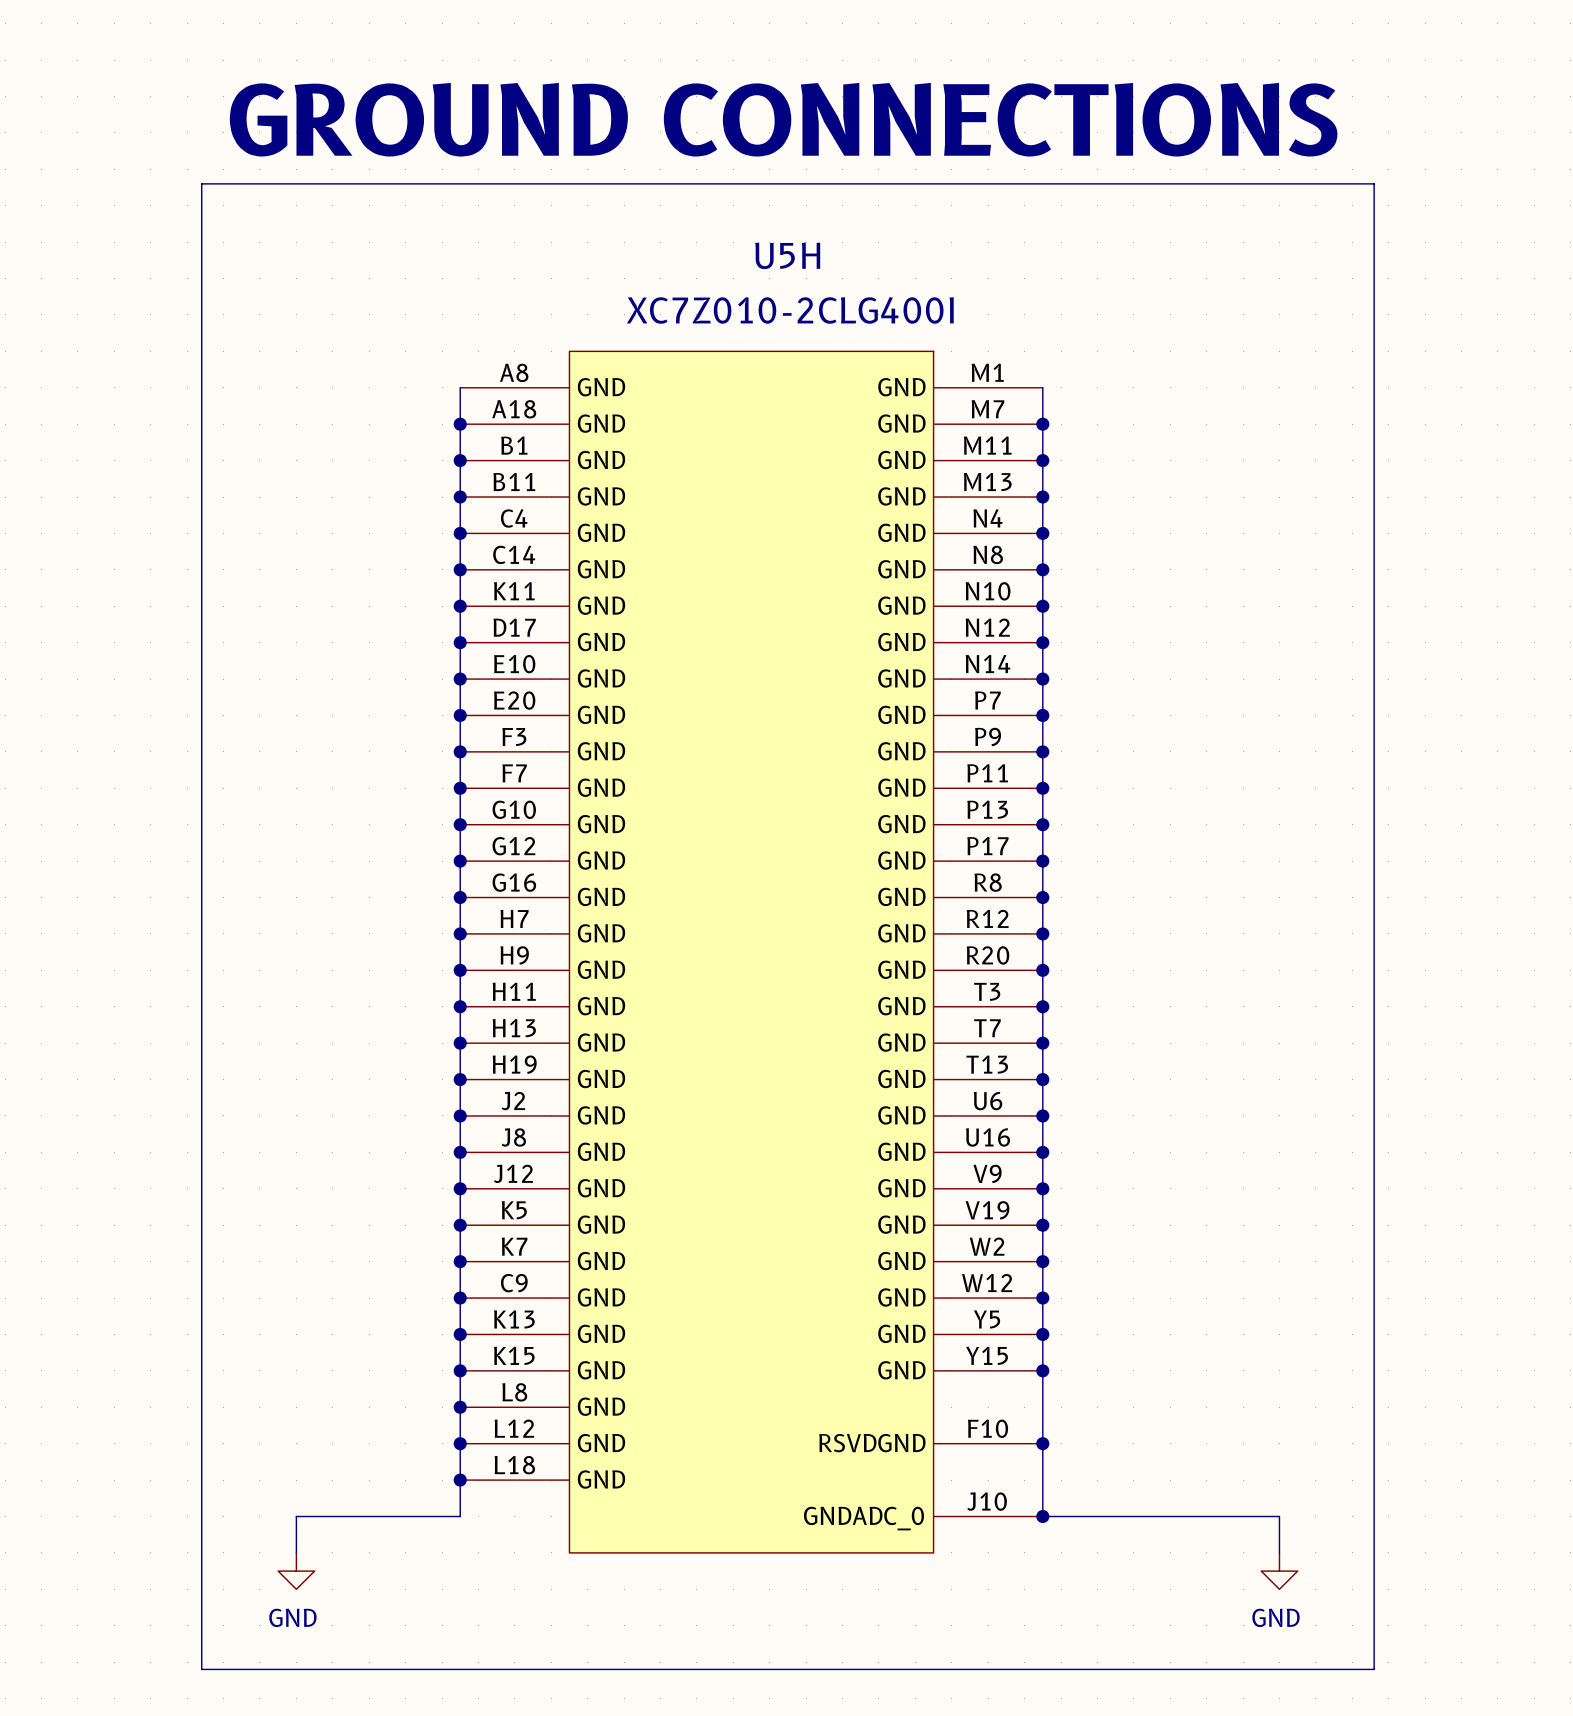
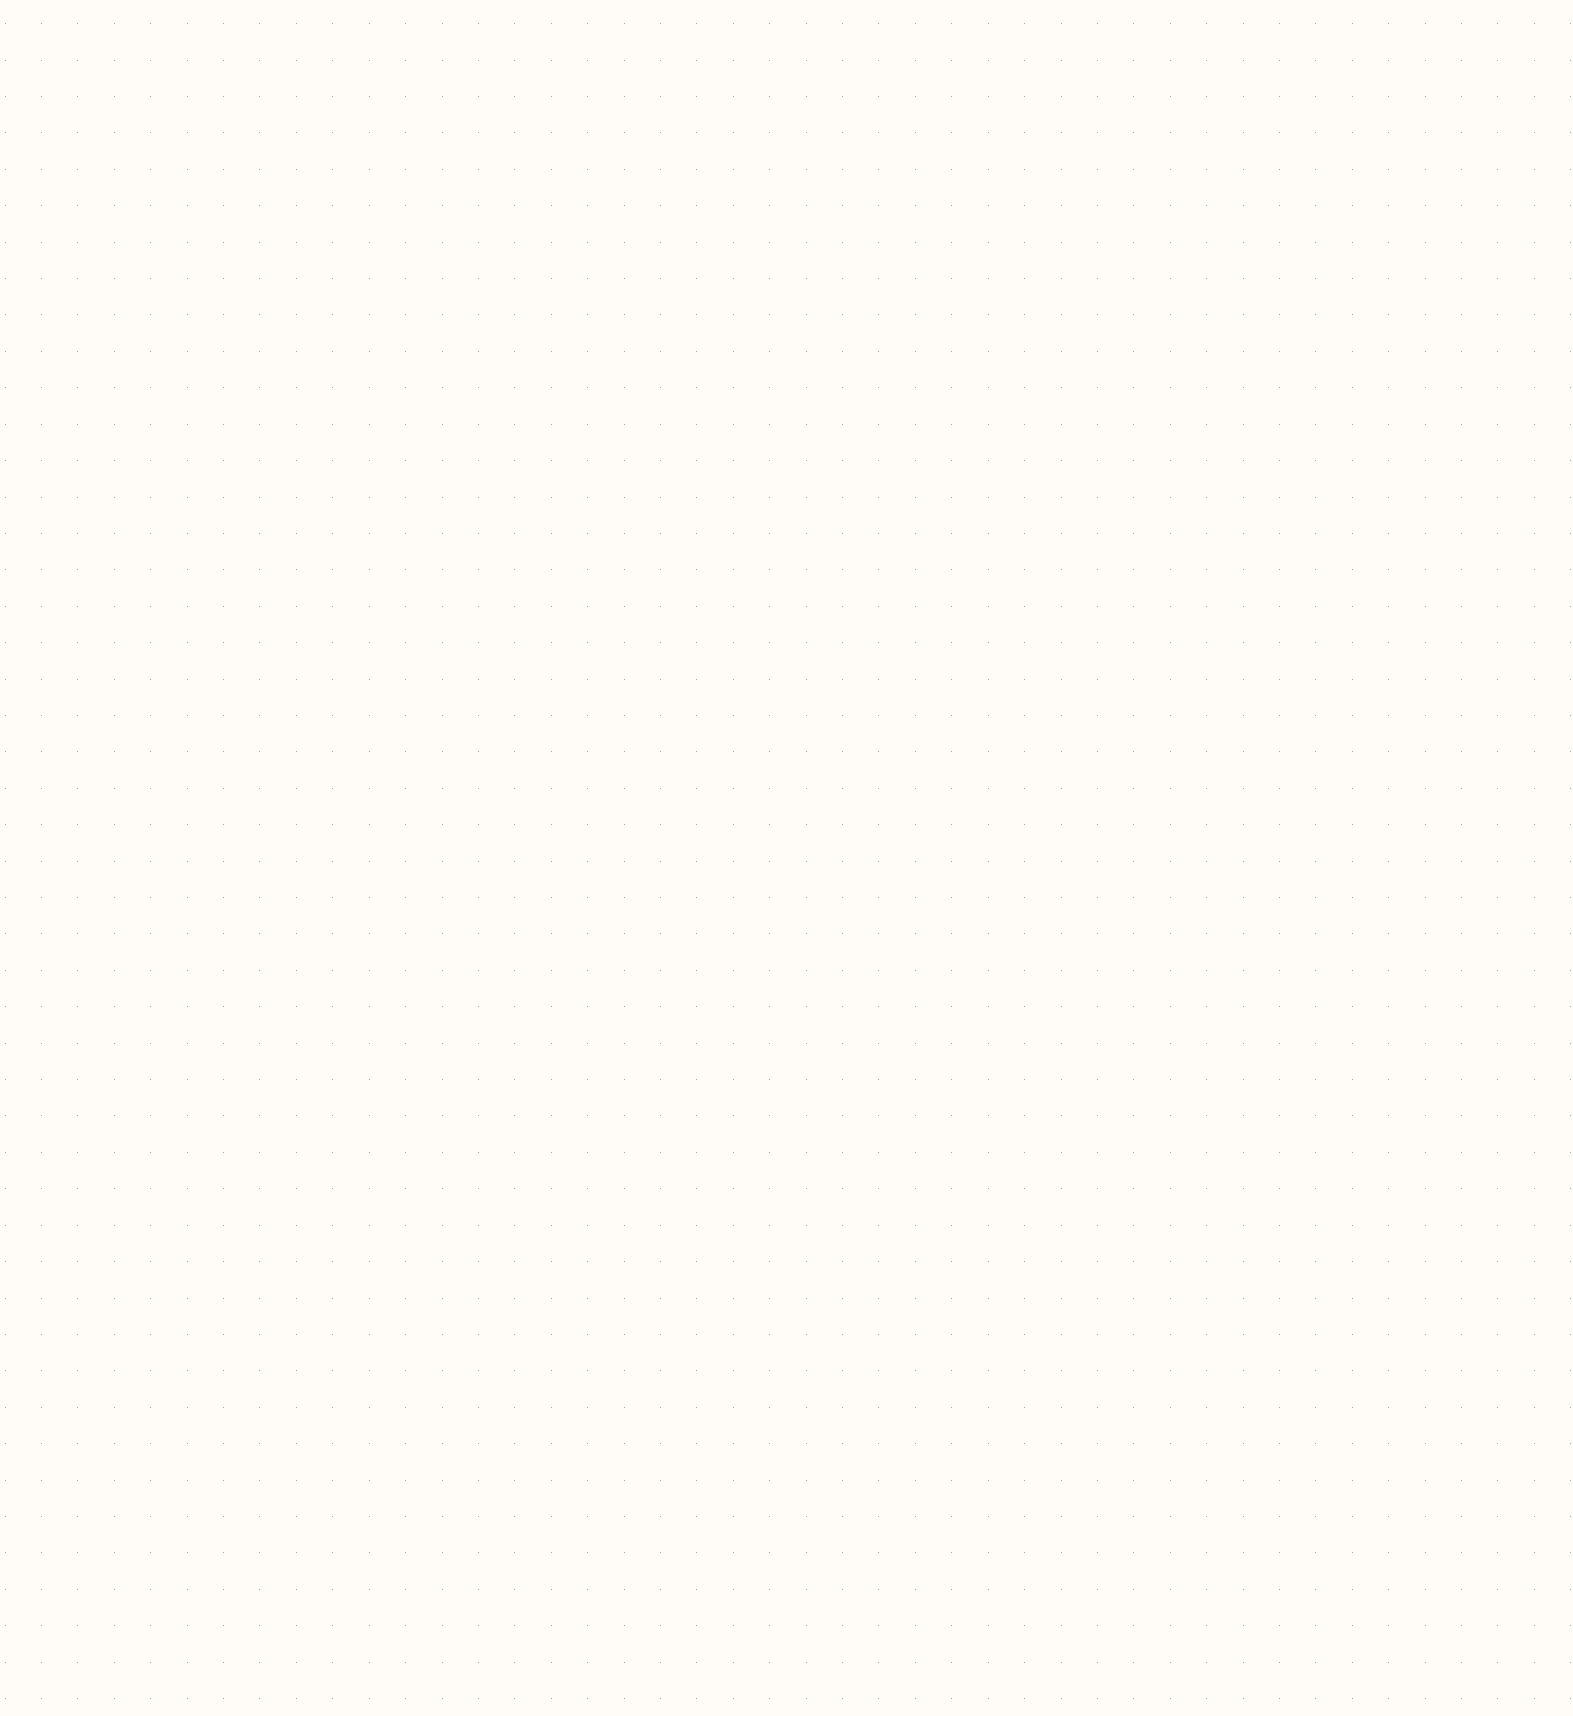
text: GROUND CONNECTIONS (783, 119) -> none
line: (201, 183) (1374, 183) (1374, 1669) (201, 1669) (201, 183) -> none
wire: (460, 387) (460, 1516) (296, 1516) (296, 1552) -> none
wire: (1042, 387) (1042, 1516) (1279, 1516) (1279, 1552) -> none
junction: (460, 424) -> none
junction: (1042, 424) -> none
junction: (460, 460) -> none
junction: (1042, 460) -> none
junction: (460, 497) -> none
junction: (1042, 497) -> none
junction: (460, 533) -> none
junction: (1042, 533) -> none
junction: (460, 569) -> none
junction: (1042, 569) -> none
junction: (460, 606) -> none
junction: (1042, 606) -> none
junction: (460, 642) -> none
junction: (1042, 642) -> none
junction: (460, 679) -> none
junction: (1042, 679) -> none
junction: (460, 715) -> none
junction: (1042, 715) -> none
junction: (460, 751) -> none
junction: (1042, 751) -> none
junction: (460, 788) -> none
junction: (1042, 788) -> none
junction: (460, 824) -> none
junction: (1042, 824) -> none
junction: (460, 861) -> none
junction: (1042, 861) -> none
junction: (460, 897) -> none
junction: (1042, 897) -> none
junction: (460, 933) -> none
junction: (1042, 933) -> none
U5H: XC7Z010-2CLG400I (751, 952) -> none
junction: (460, 970) -> none
junction: (1042, 970) -> none
junction: (460, 1006) -> none
junction: (1042, 1006) -> none
junction: (460, 1043) -> none
junction: (1042, 1043) -> none
junction: (460, 1079) -> none
junction: (1042, 1079) -> none
junction: (460, 1115) -> none
junction: (1042, 1115) -> none
junction: (460, 1152) -> none
junction: (1042, 1152) -> none
junction: (460, 1188) -> none
junction: (1042, 1188) -> none
junction: (460, 1225) -> none
junction: (1042, 1225) -> none
junction: (460, 1261) -> none
junction: (1042, 1261) -> none
junction: (460, 1298) -> none
junction: (1042, 1298) -> none
junction: (460, 1334) -> none
junction: (1042, 1334) -> none
junction: (460, 1370) -> none
junction: (1042, 1370) -> none
junction: (460, 1407) -> none
junction: (460, 1443) -> none
junction: (1042, 1443) -> none
junction: (460, 1480) -> none
junction: (1042, 1516) -> none
power symbol: GND (296, 1571) -> none
power symbol: GND (1279, 1571) -> none

